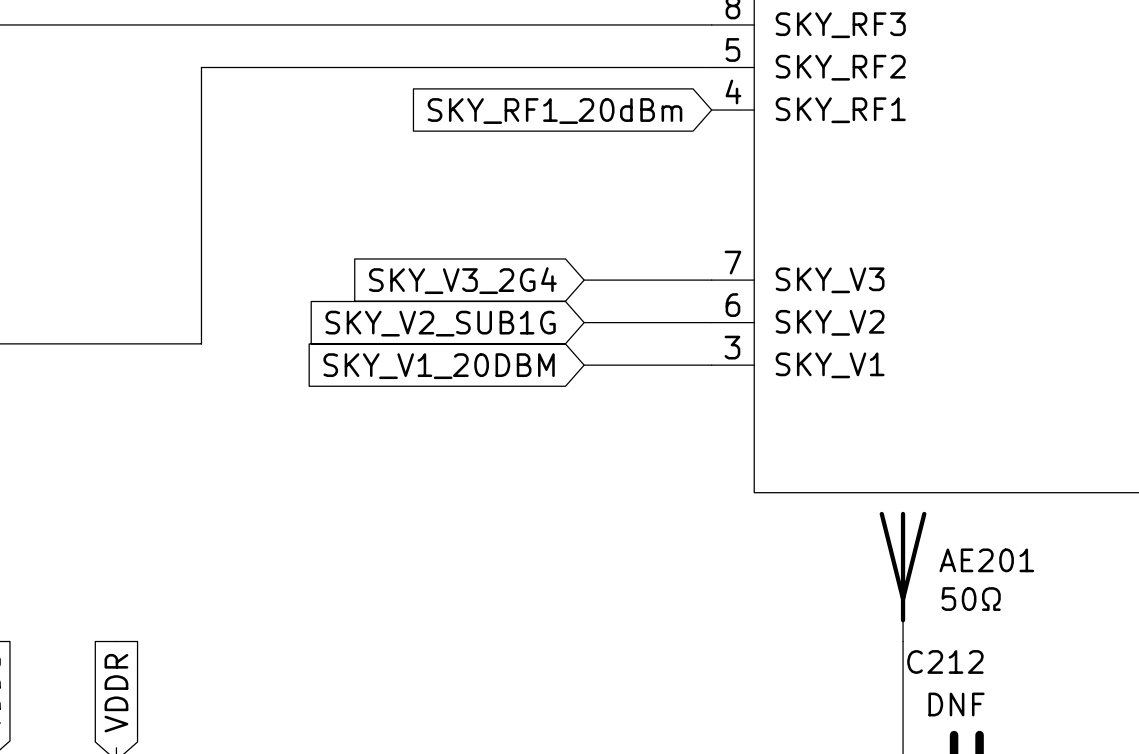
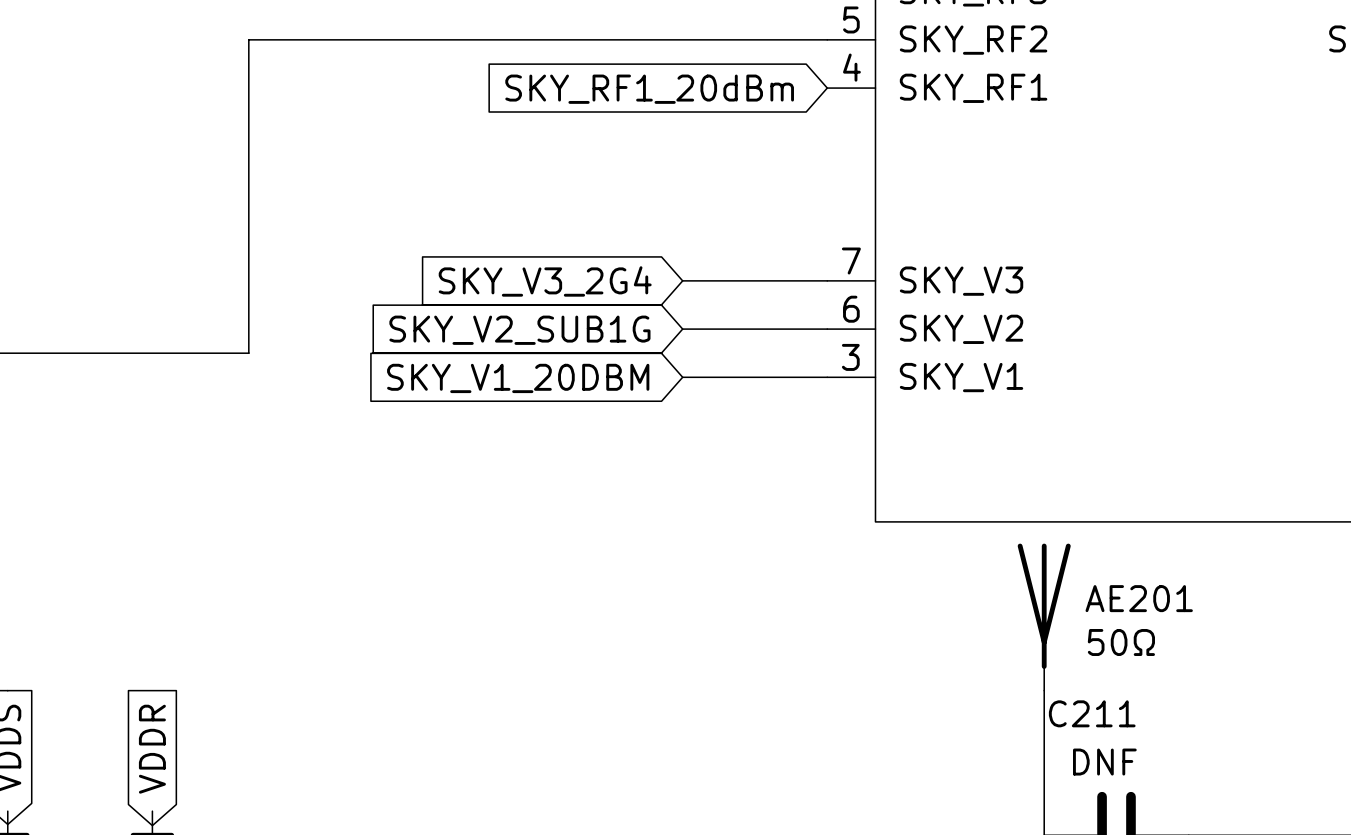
C212 name: C212 (945, 661) -> C211 (1092, 713)

